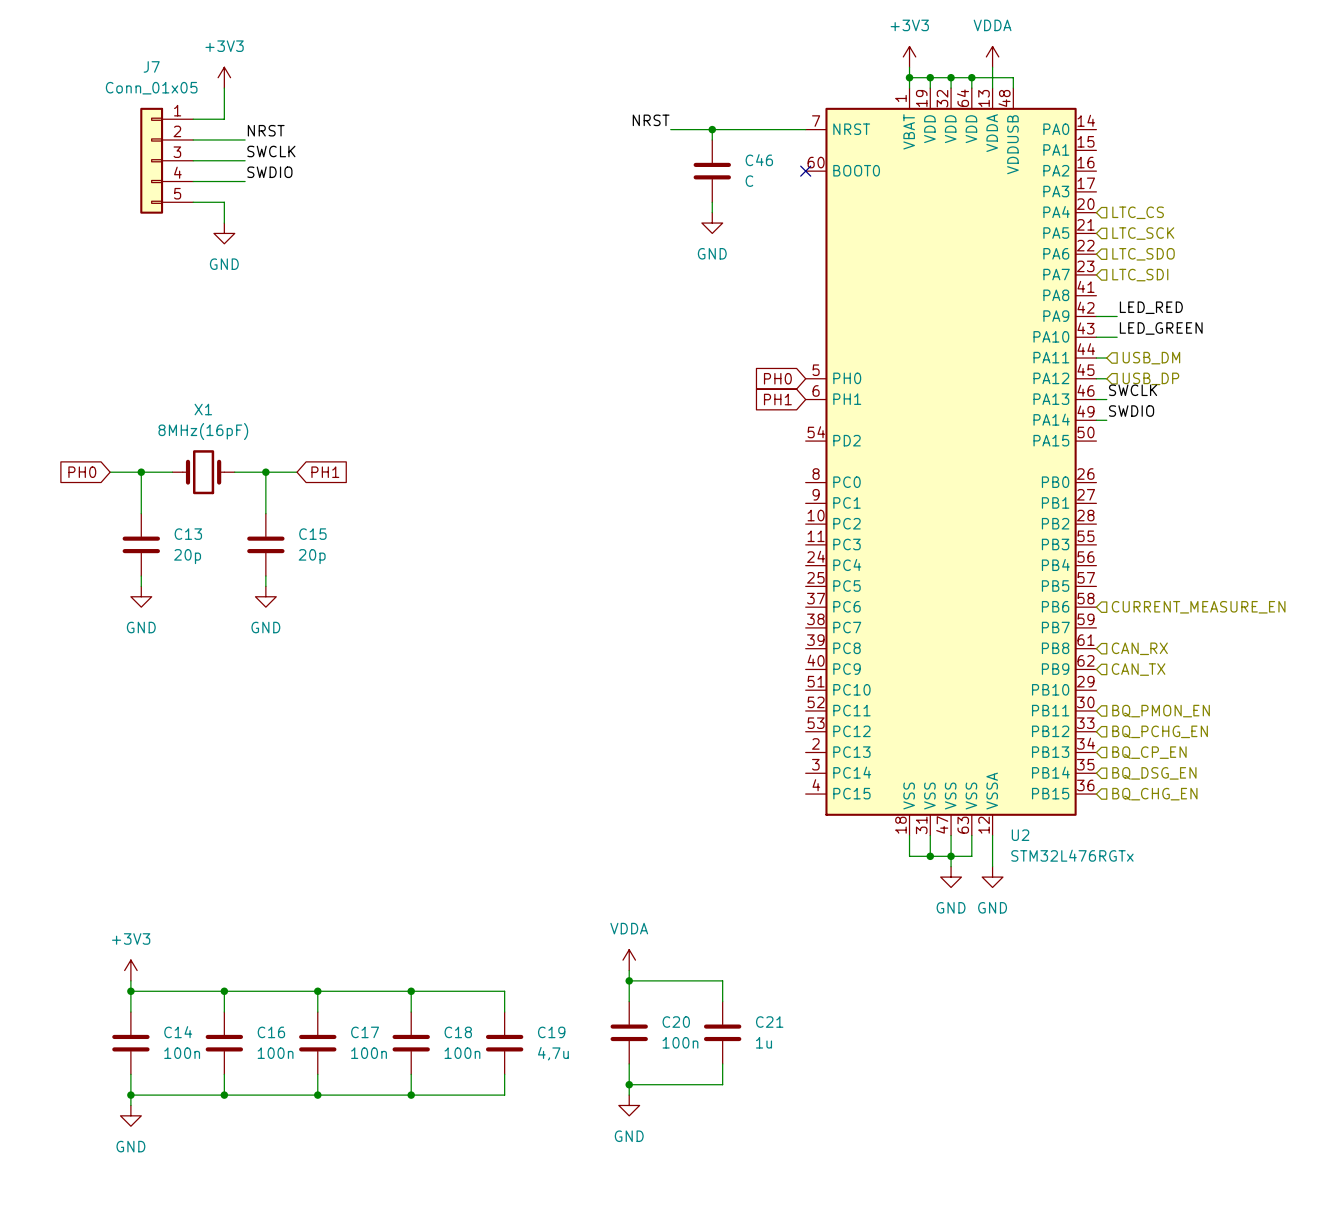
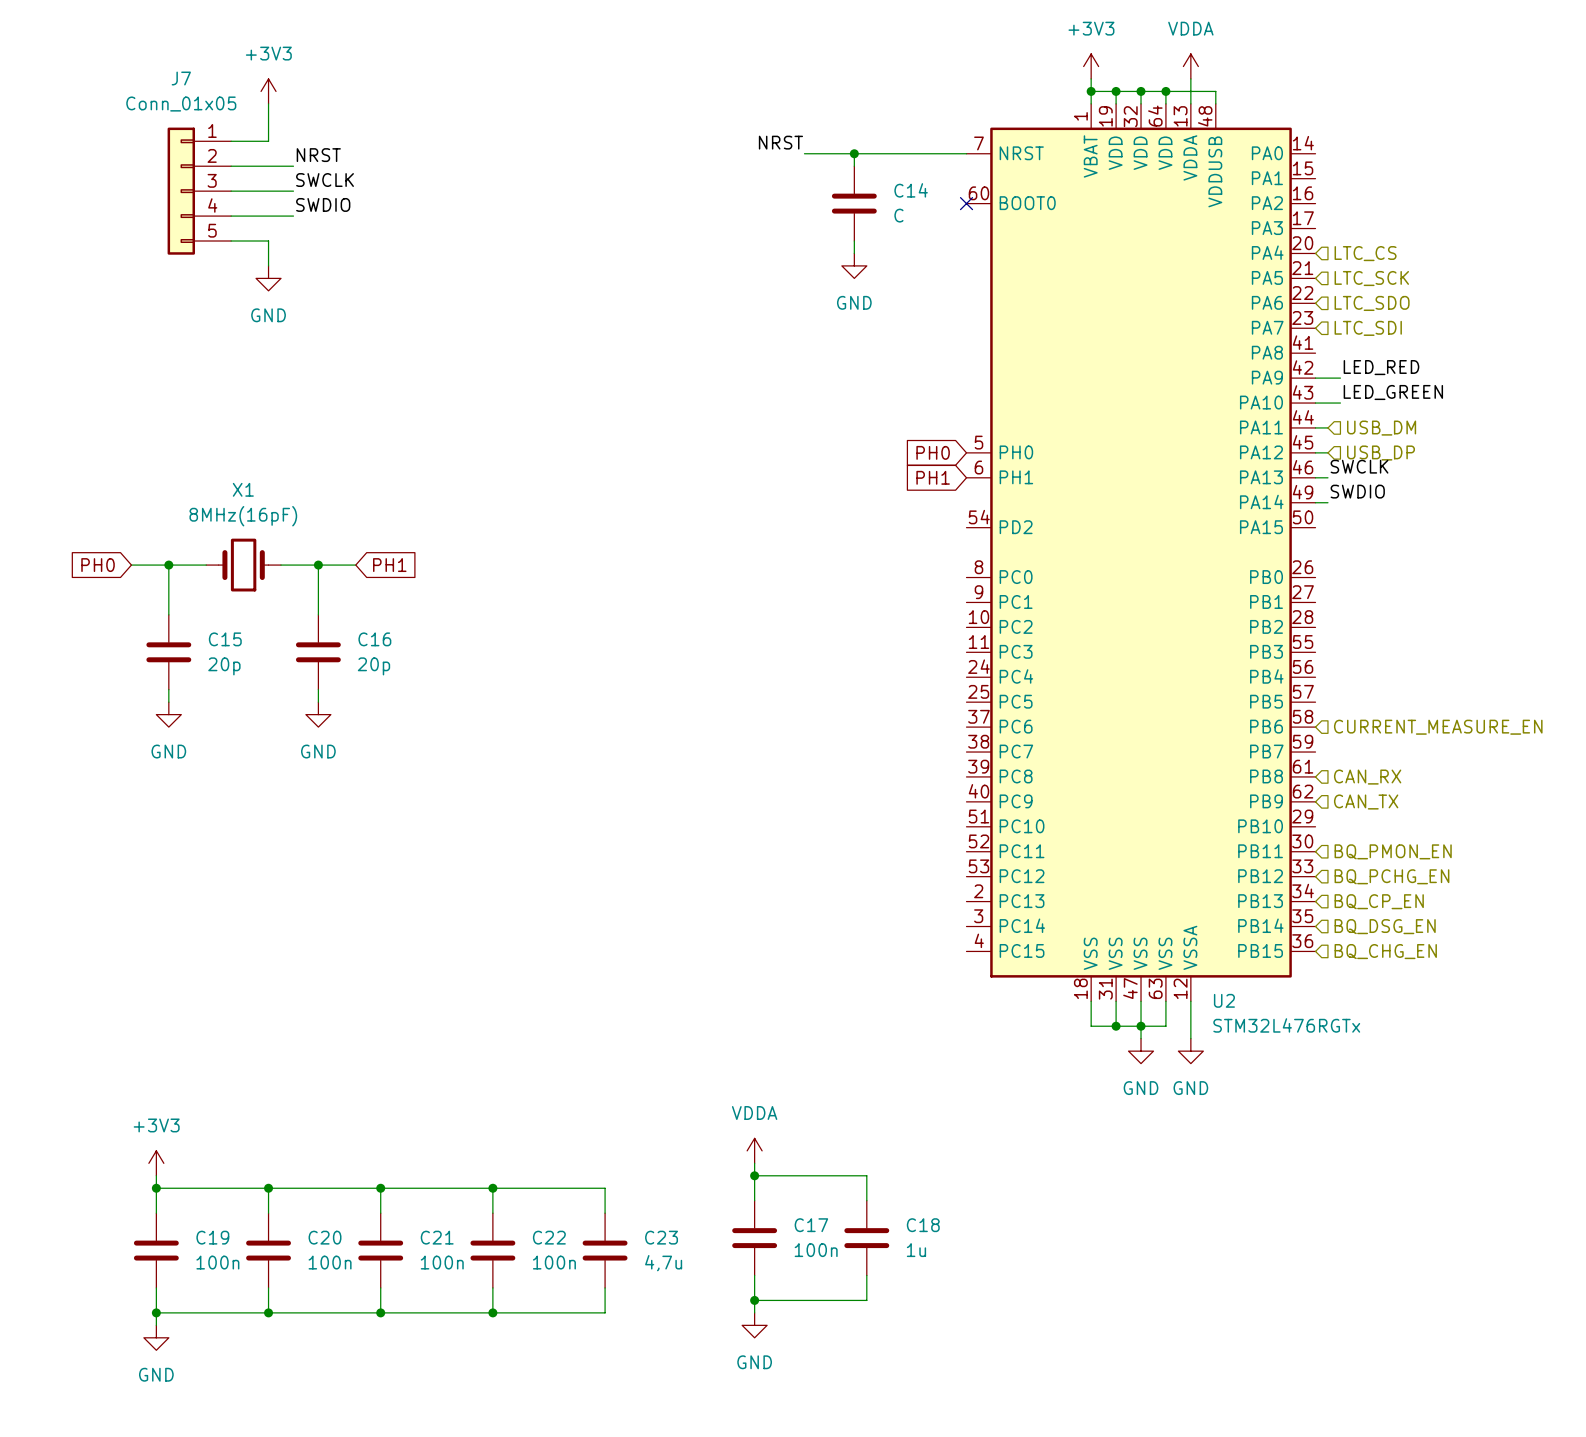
C46 name: C46 (759, 160) -> C14 (911, 190)
C13 name: C13 (188, 534) -> C15 (225, 639)
C15 name: C15 (312, 534) -> C16 (374, 639)
C20 name: C20 (676, 1022) -> C17 (811, 1225)
C21 name: C21 (769, 1022) -> C18 (923, 1225)
C14 name: C14 (178, 1032) -> C19 (212, 1237)
C16 name: C16 (271, 1032) -> C20 (325, 1237)
C17 name: C17 (365, 1032) -> C21 (437, 1237)
C18 name: C18 (458, 1032) -> C22 (549, 1237)
C19 name: C19 (551, 1032) -> C23 (661, 1237)

